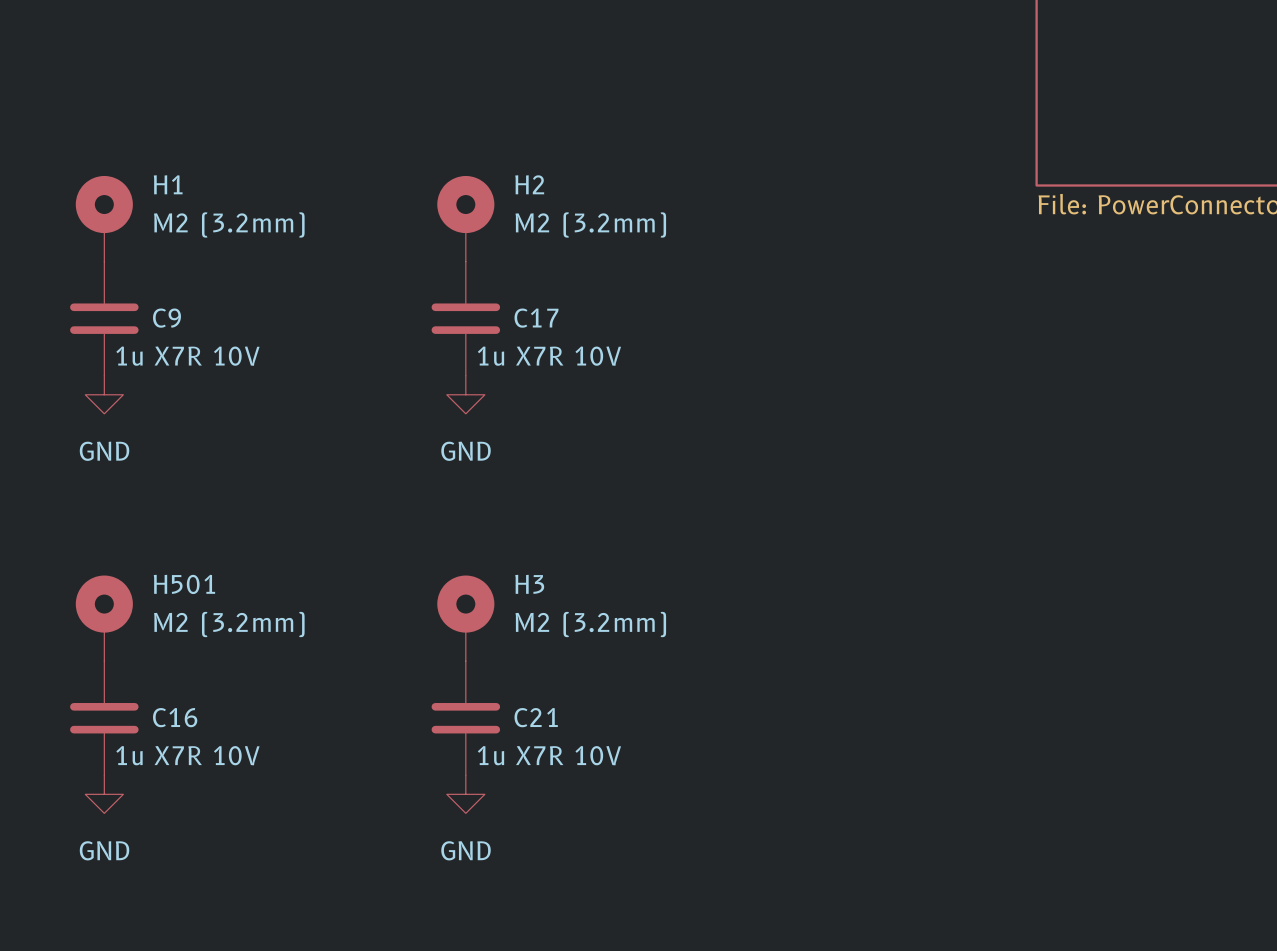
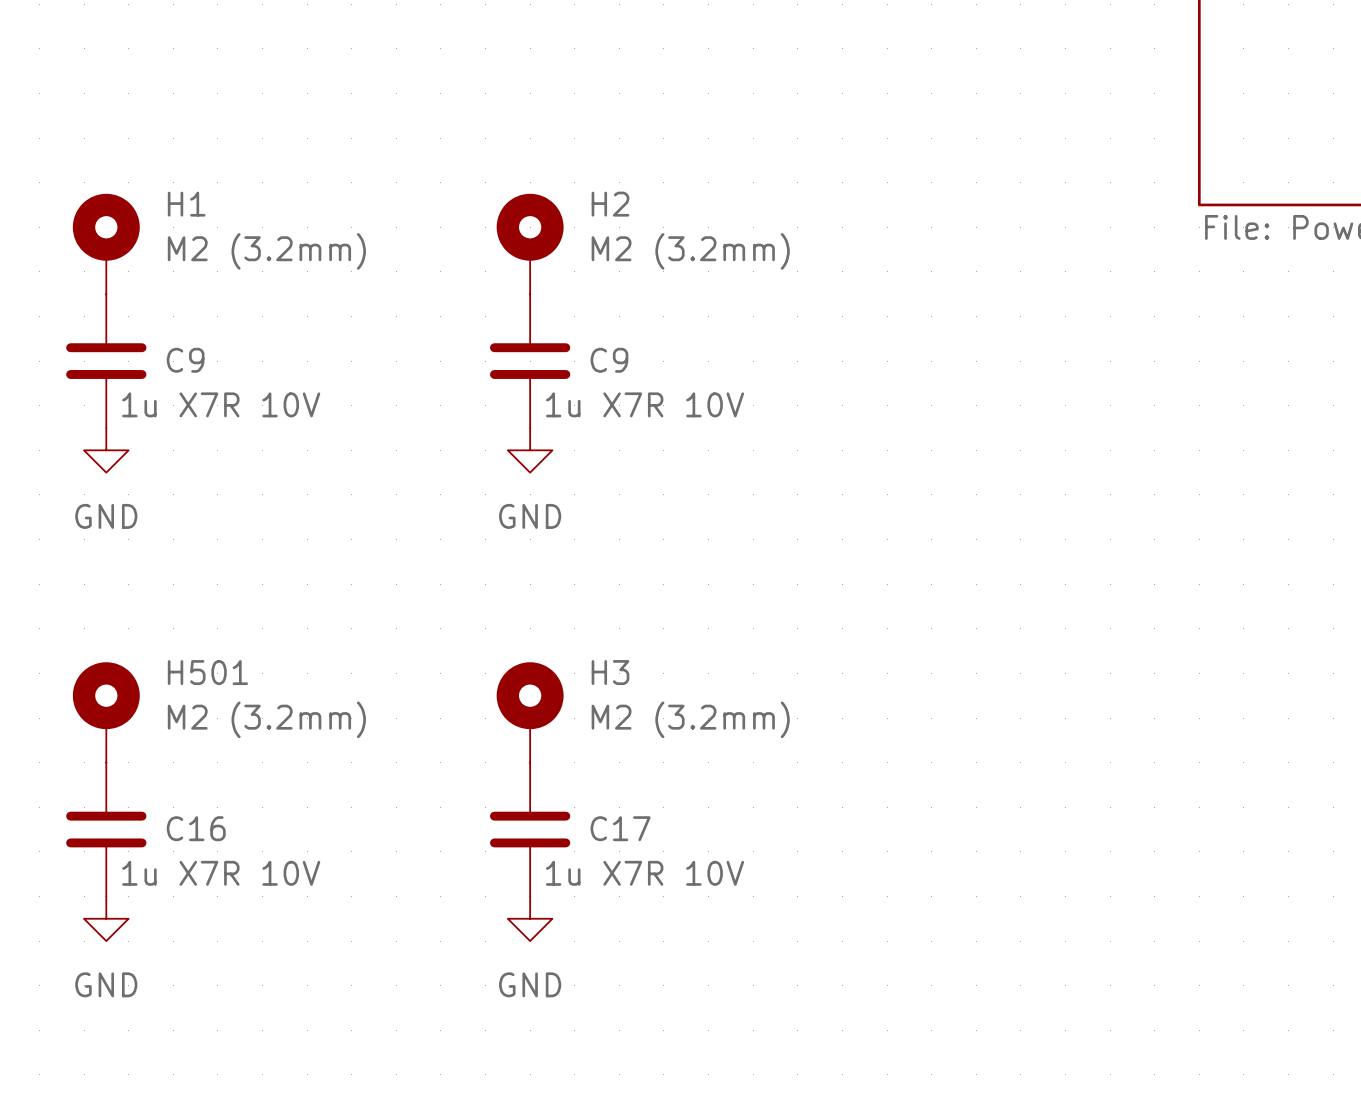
C17 name: C17 (536, 318) -> C9 (609, 360)
C21 name: C21 (536, 717) -> C17 (620, 828)

